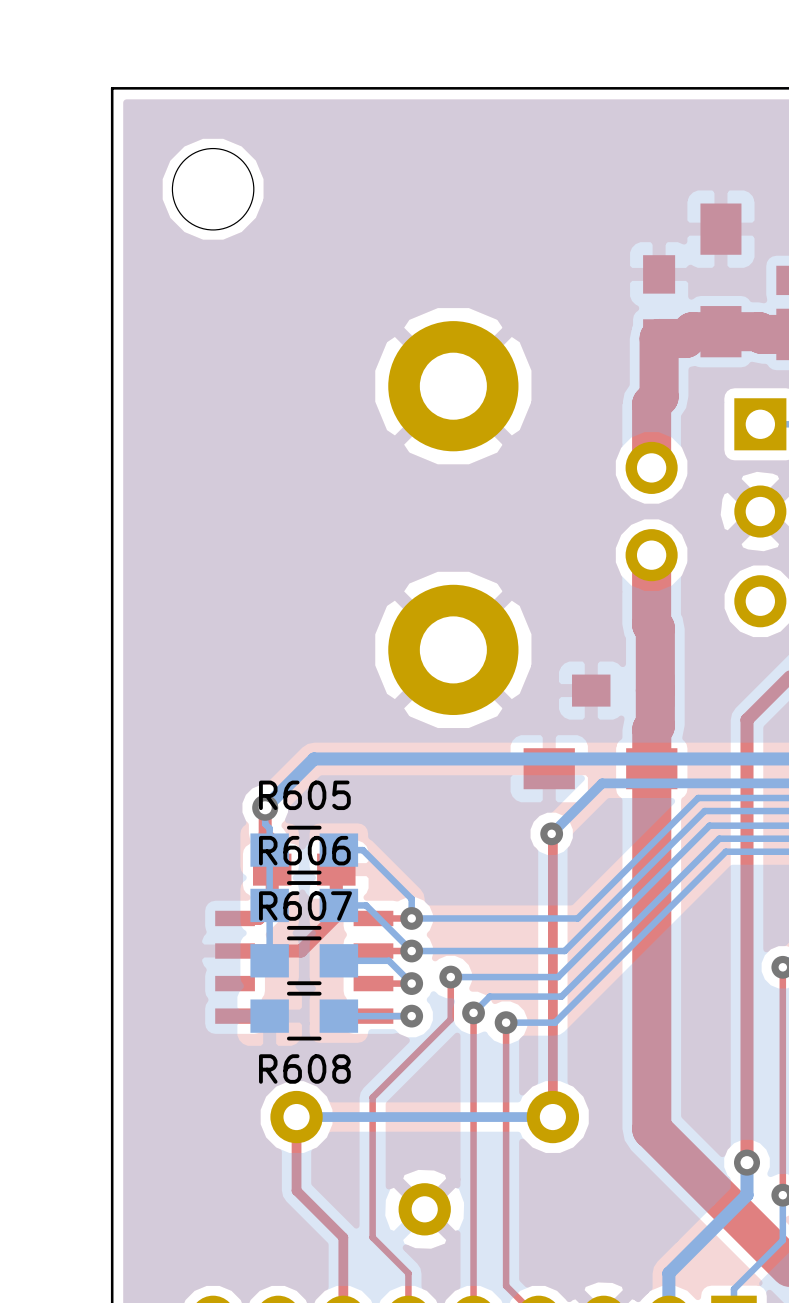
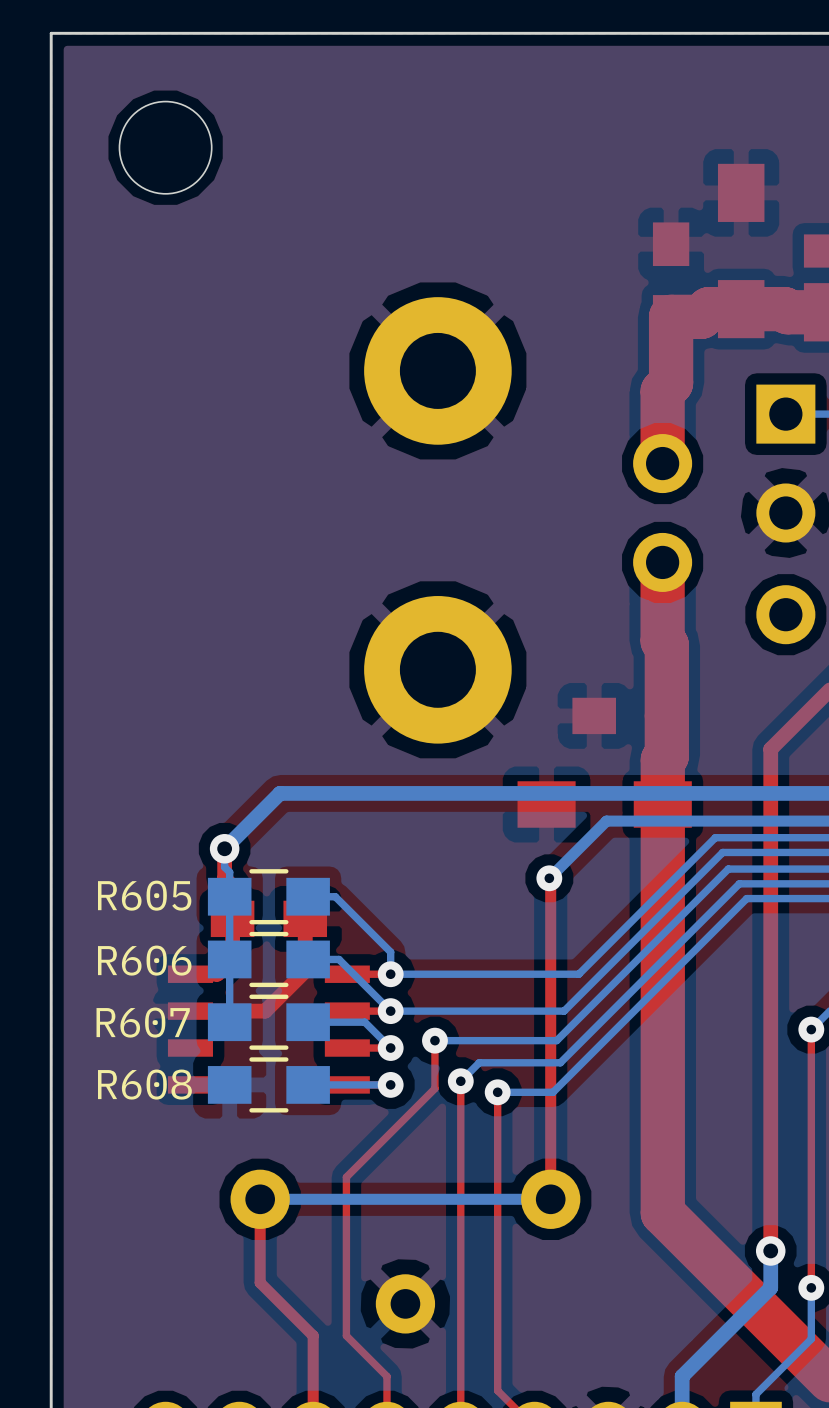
R605 name position: R605 (304, 795) -> R605 (144, 895)
R606 name position: R606 (304, 850) -> R606 (144, 960)
R607 name position: R607 (305, 906) -> R607 (143, 1022)
R608 name position: R608 (304, 1069) -> R608 (144, 1084)

